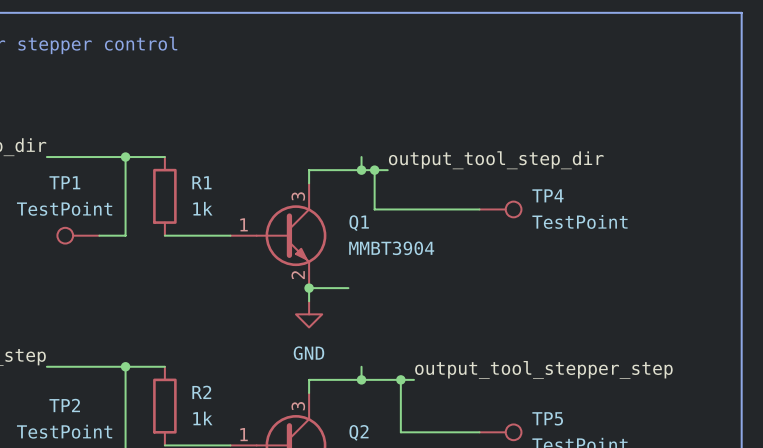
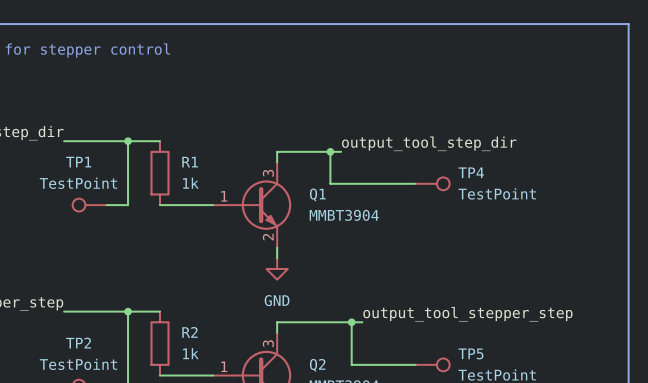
wire: (361, 157) (361, 170) -> none
junction: (361, 170) -> none
wire: (309, 288) (348, 288) -> none
junction: (309, 288) -> none
wire: (361, 366) (361, 379) -> none
junction: (361, 379) -> none

